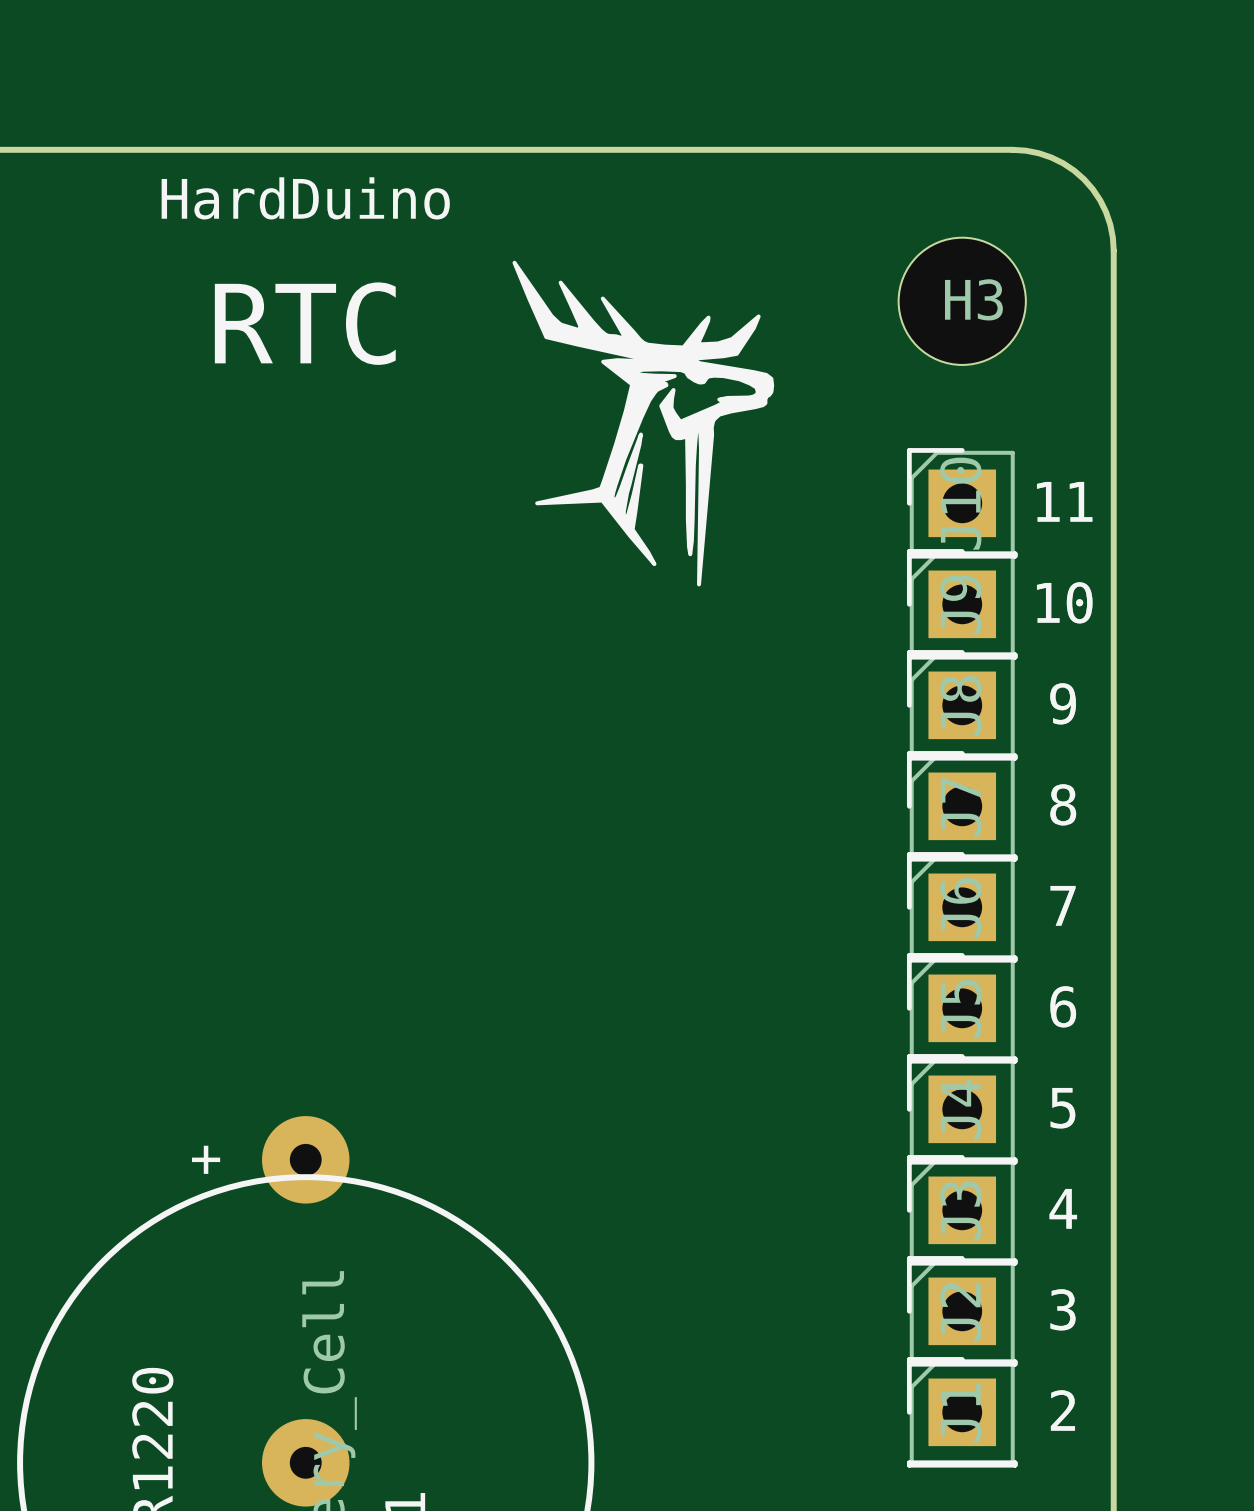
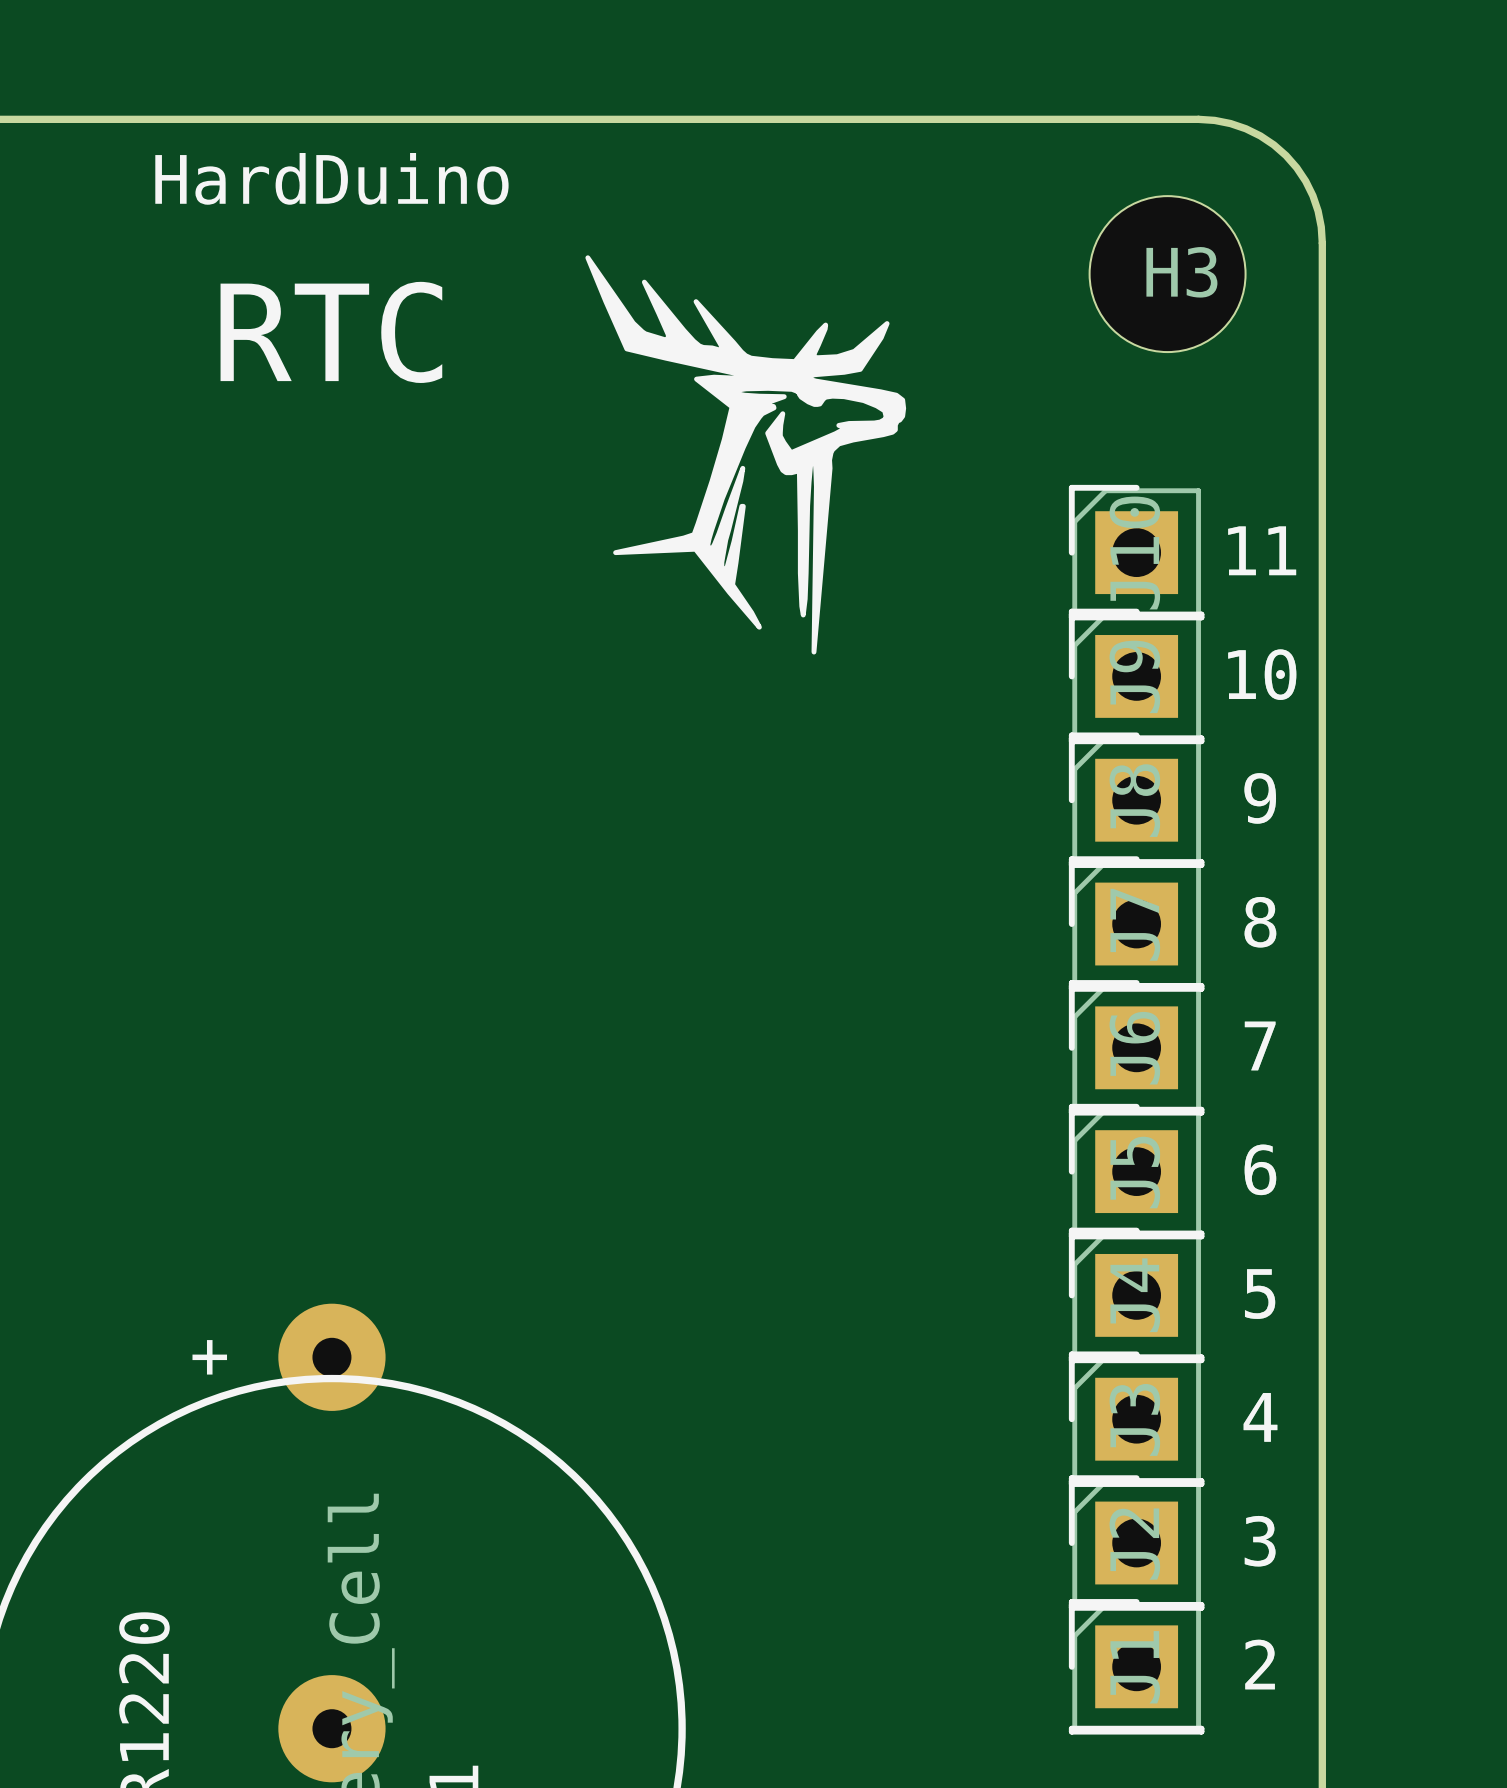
H3 position: (962, 301) -> (1167, 274)

